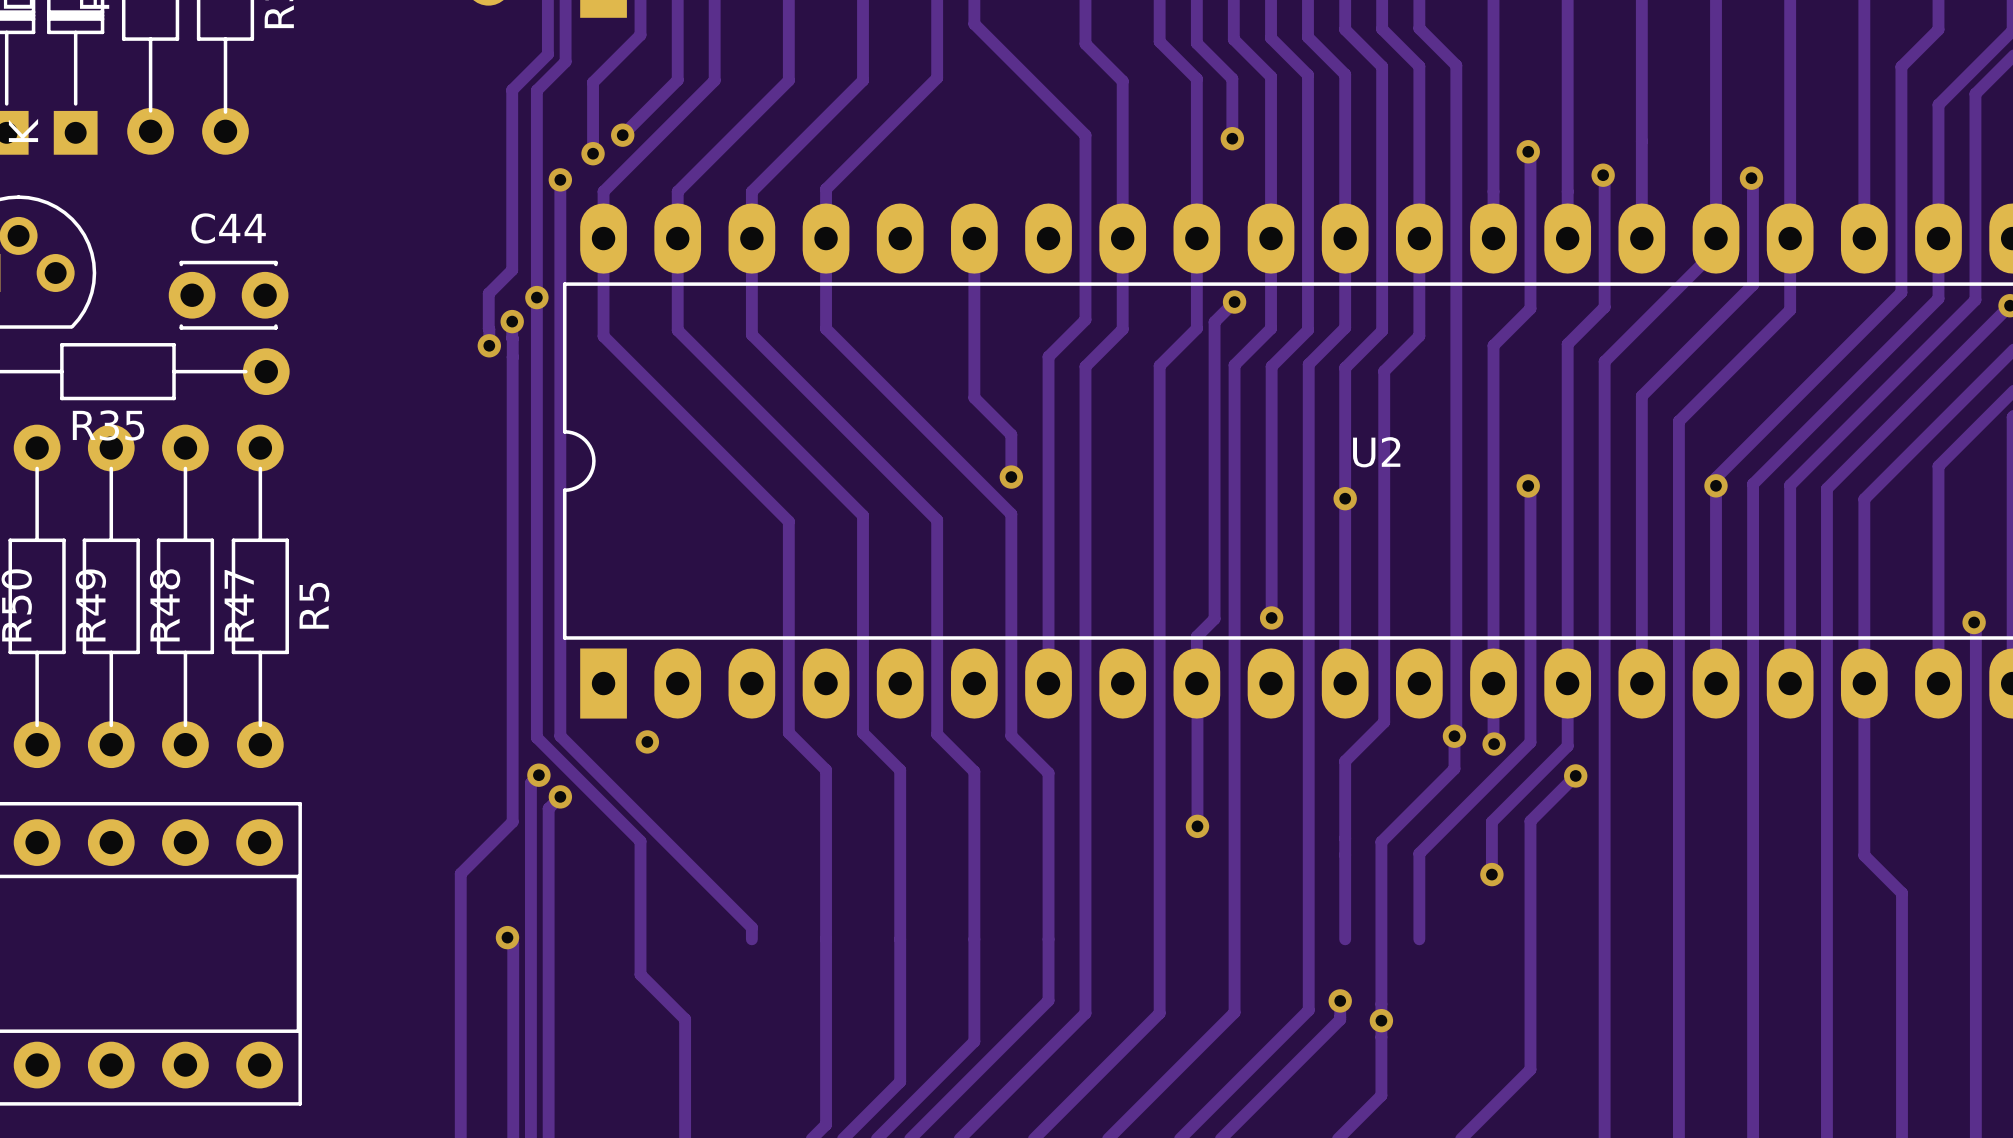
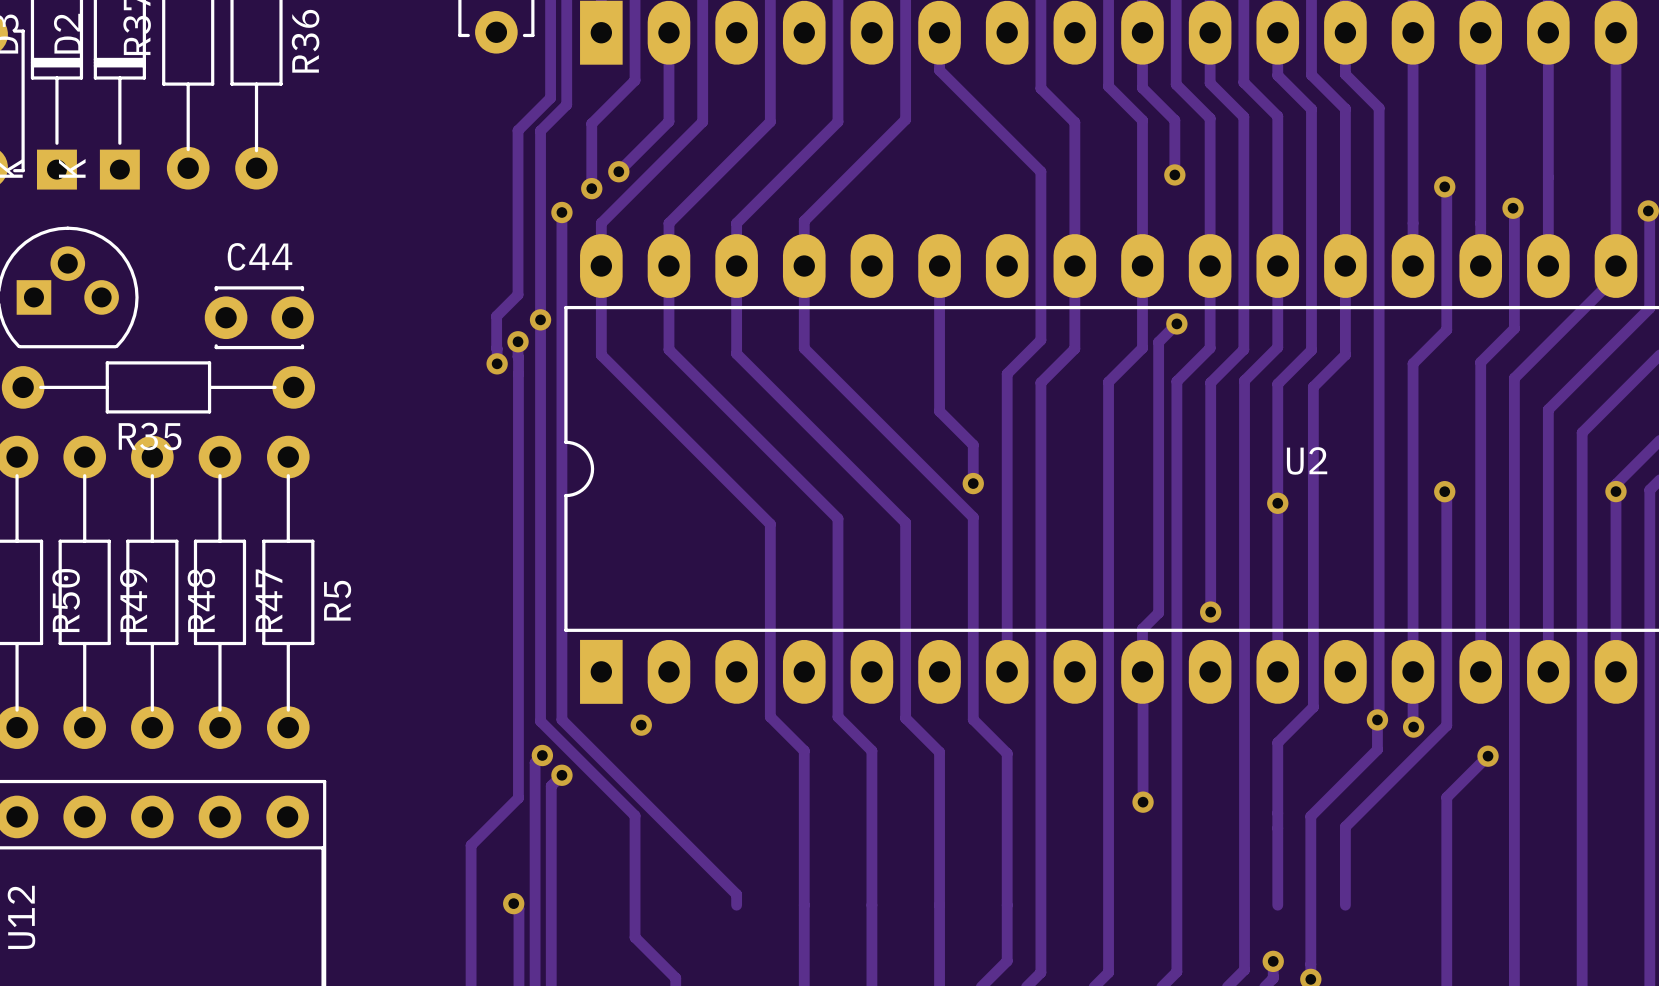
track: (1567, 683) (1567, 746) (1491, 821) (1491, 874) -> none
via: (1491, 874) -> none

